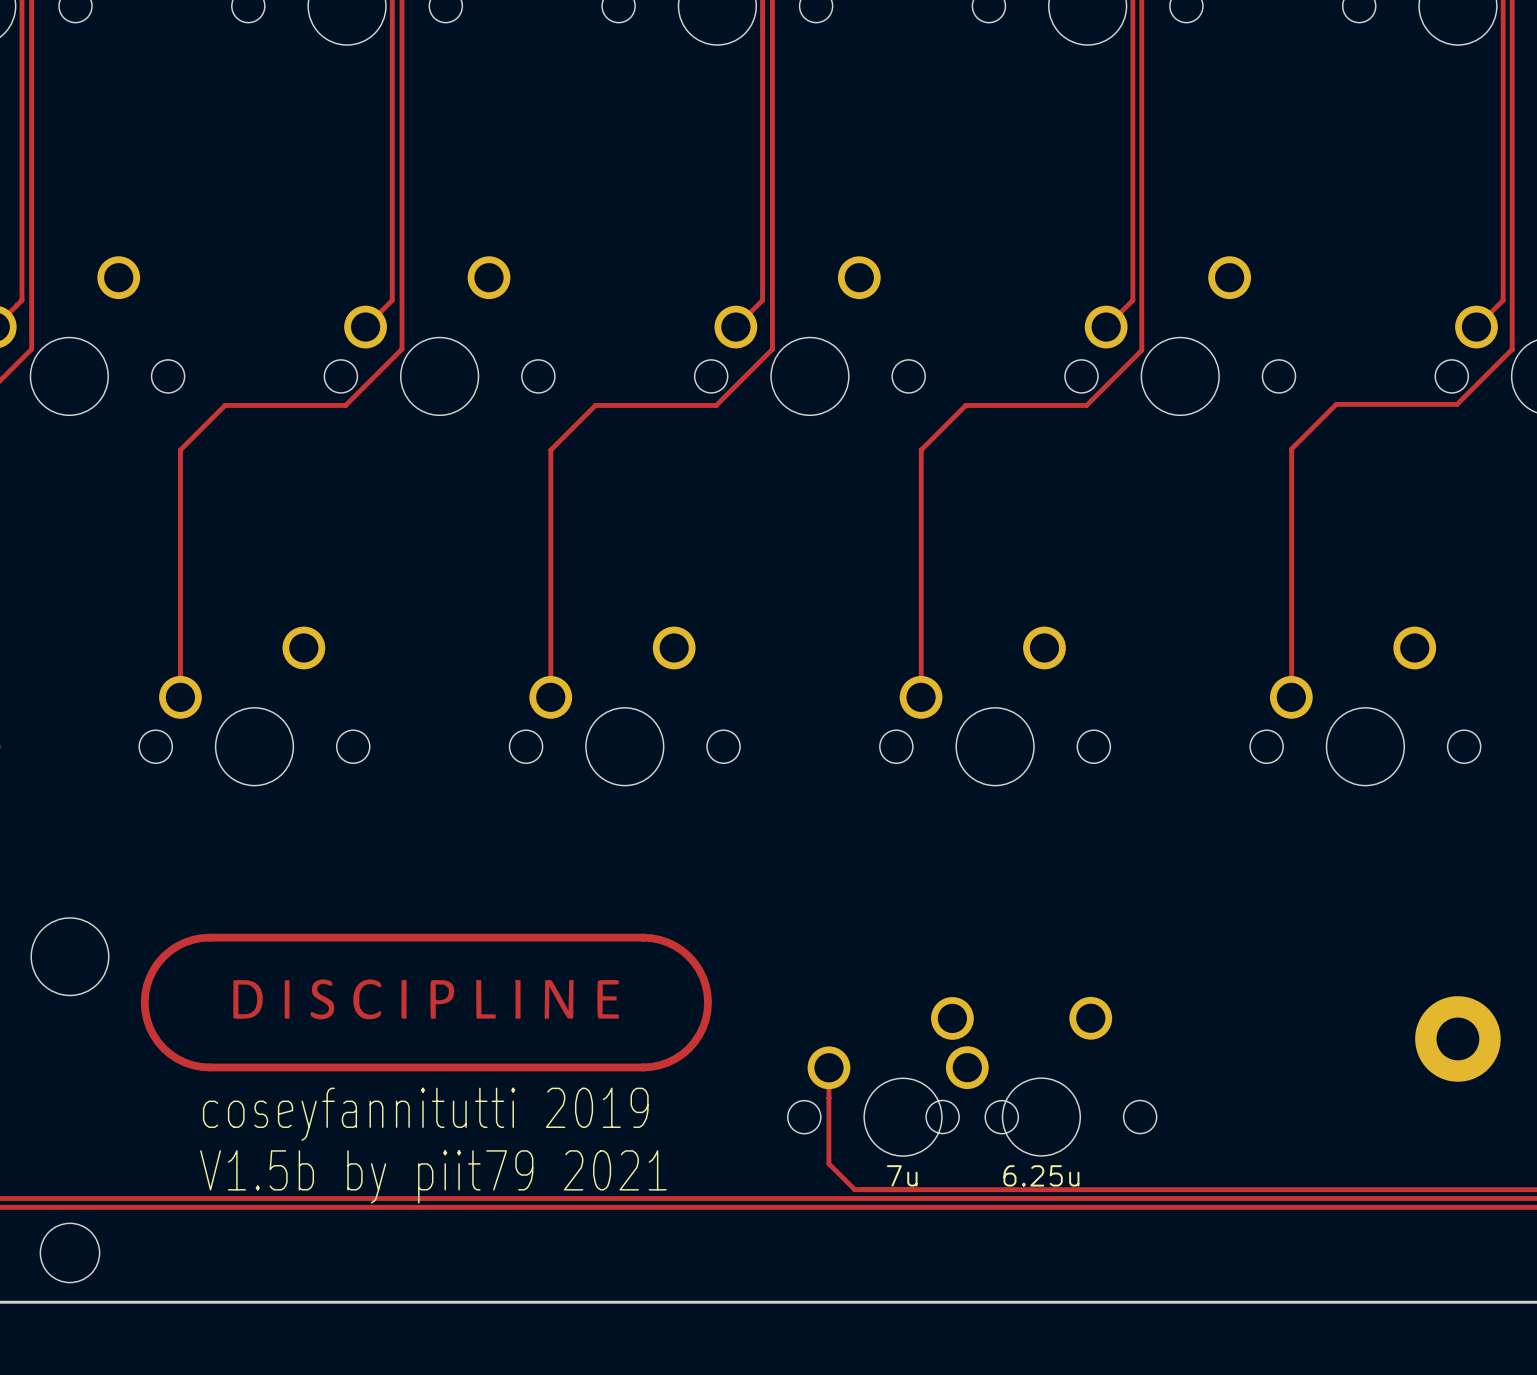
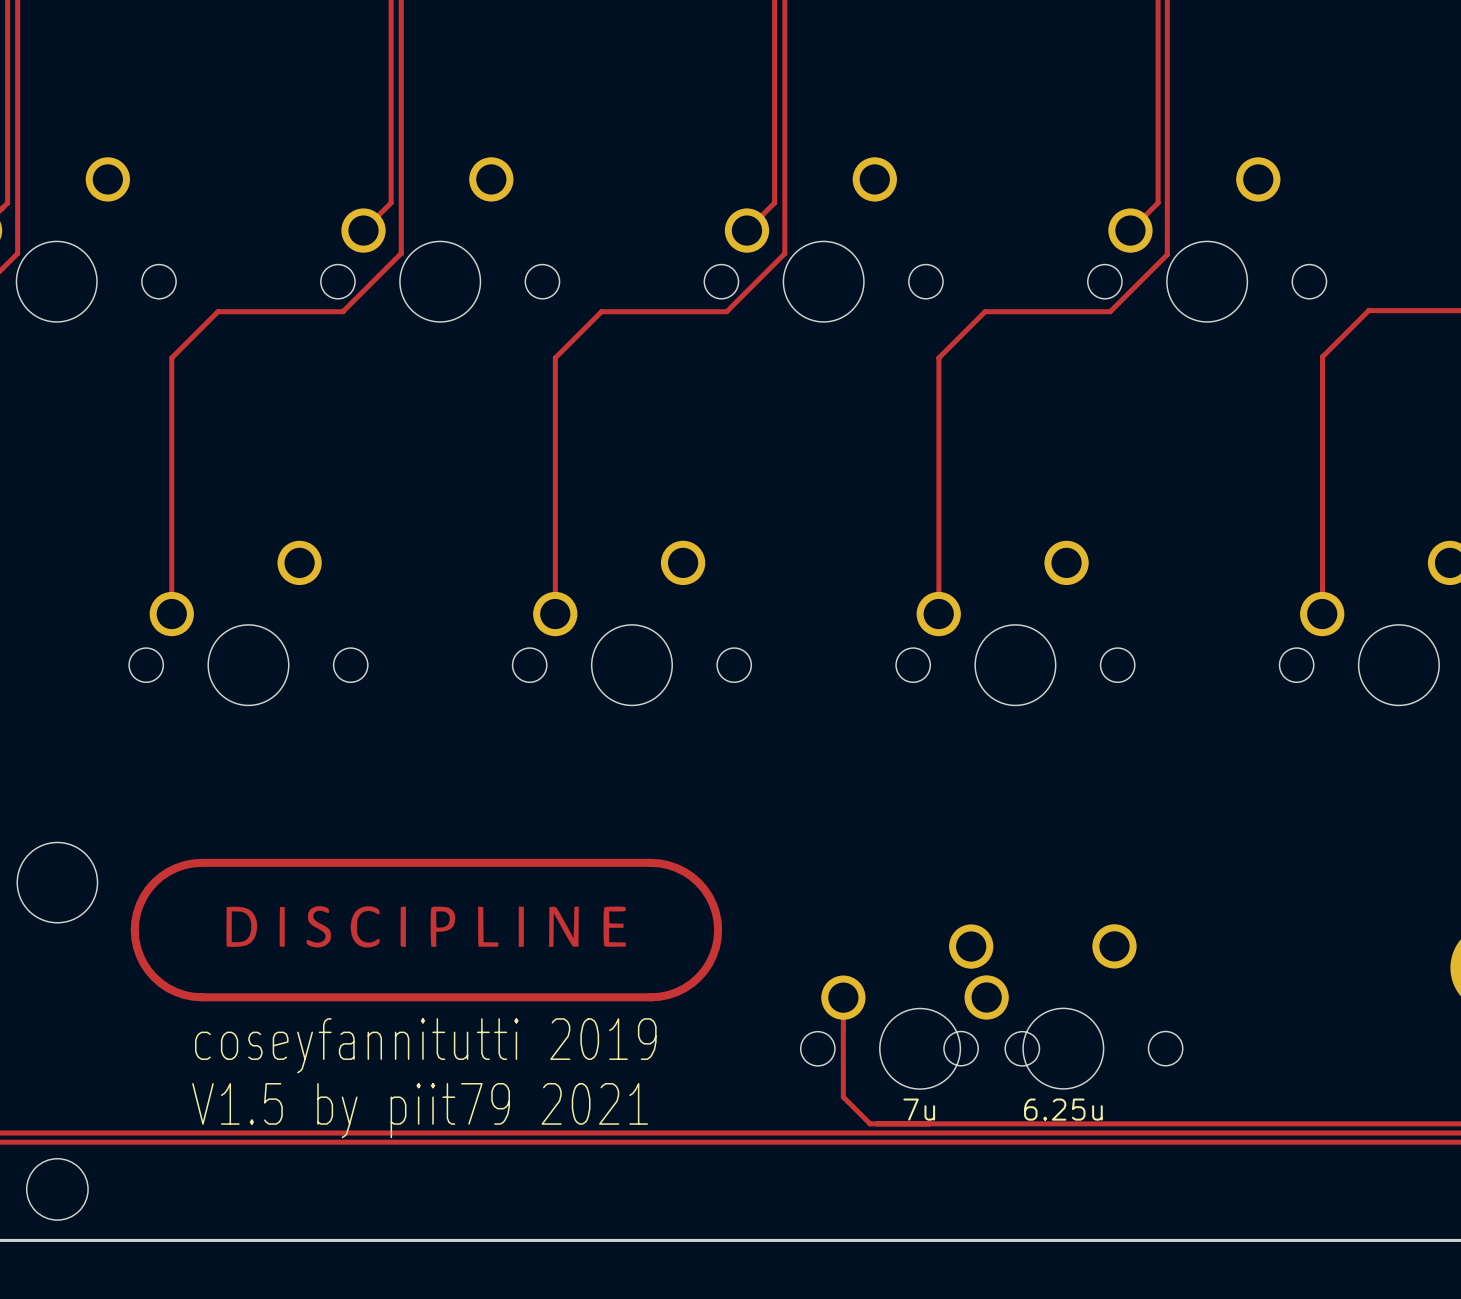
text: V1.5b by piit79 2021 (433, 1176) -> V1.5 by piit79 2021 (420, 1110)

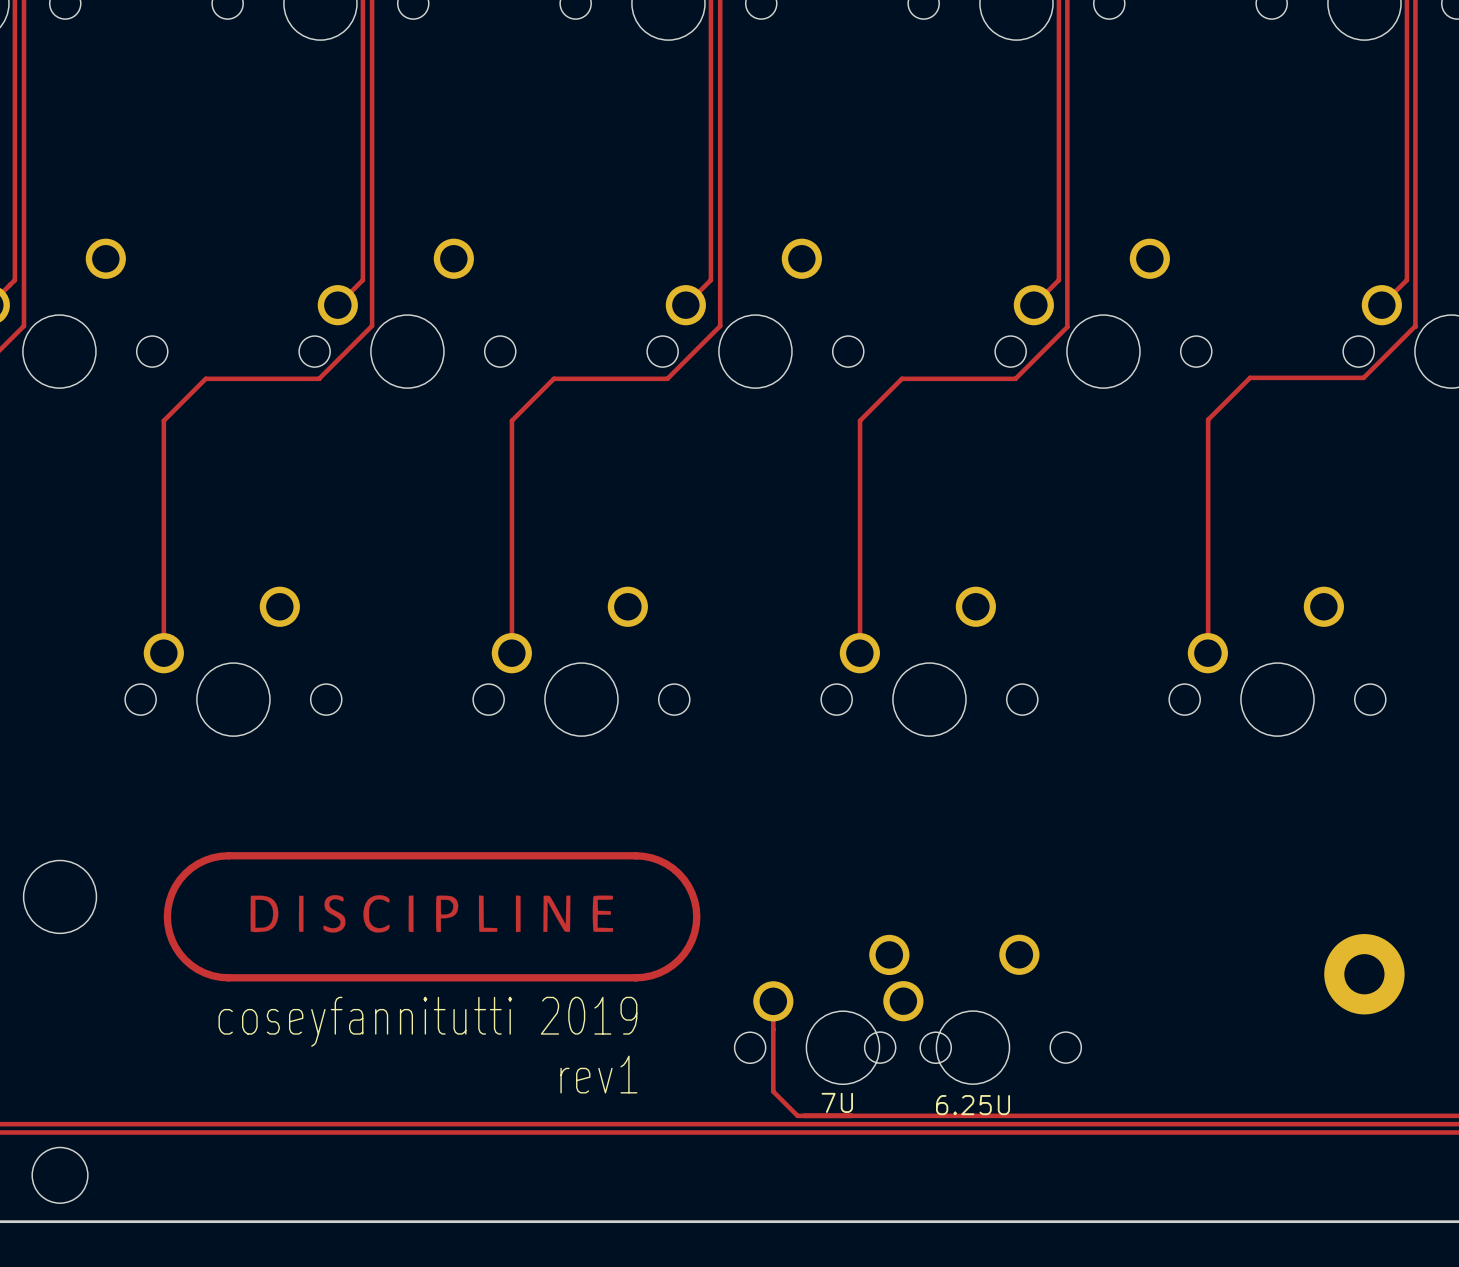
drawing position: (426, 930) -> (432, 916)
text: none -> coseyfannitutti 2019 (427, 1021)
text: coseyfannitutti 2019 (425, 1045) -> none
text: none -> rev1 (598, 1074)
part value: 7u (919, 1109) -> 7U (837, 1102)
part value: 6.25u (1063, 1109) -> 6.25U (973, 1105)
text: V1.5 by piit79 2021 (420, 1110) -> none

